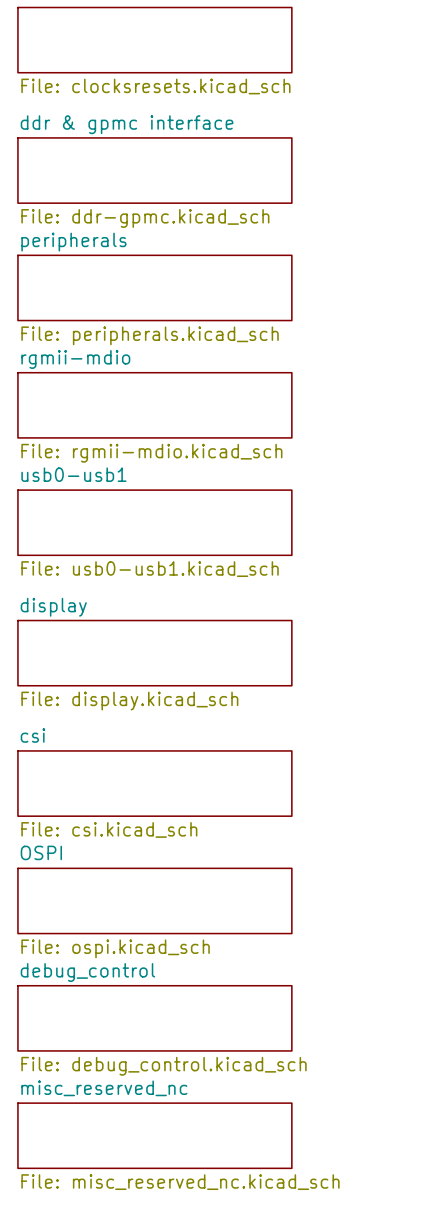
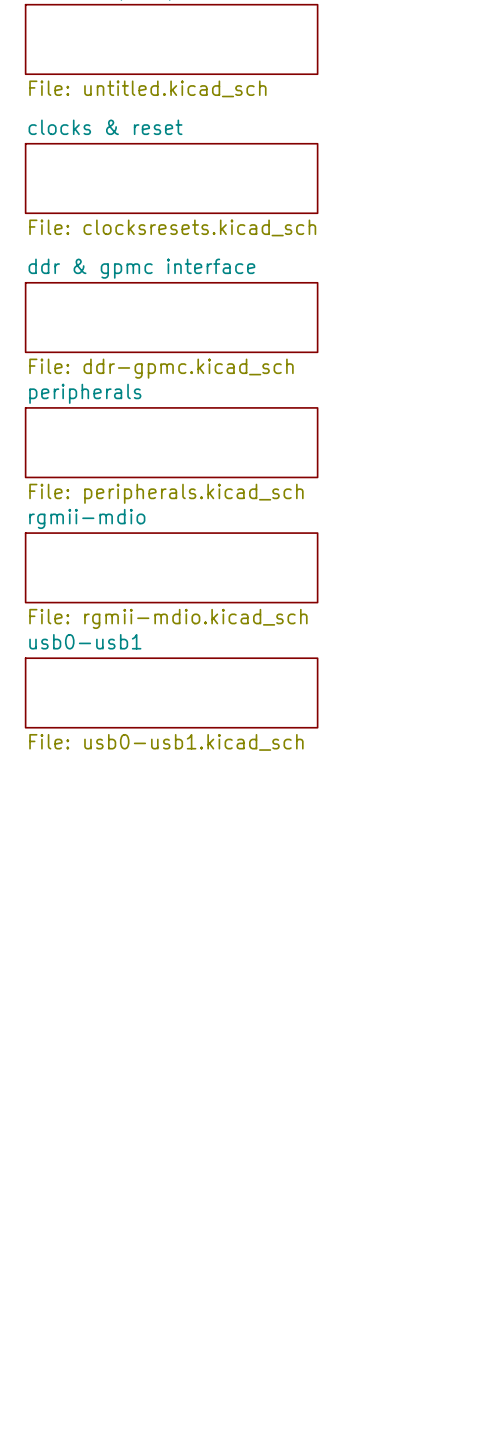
sheet display: File: display.kicad_sch (154, 653) -> none
sheet csi: File: csi.kicad_sch (154, 783) -> none
sheet OSPI: File: ospi.kicad_sch (154, 900) -> none
sheet debug_control: File: debug_control.kicad_sch (154, 1018) -> none
sheet misc_reserved_nc: File: misc_reserved_nc.kicad_sch (154, 1135) -> none

